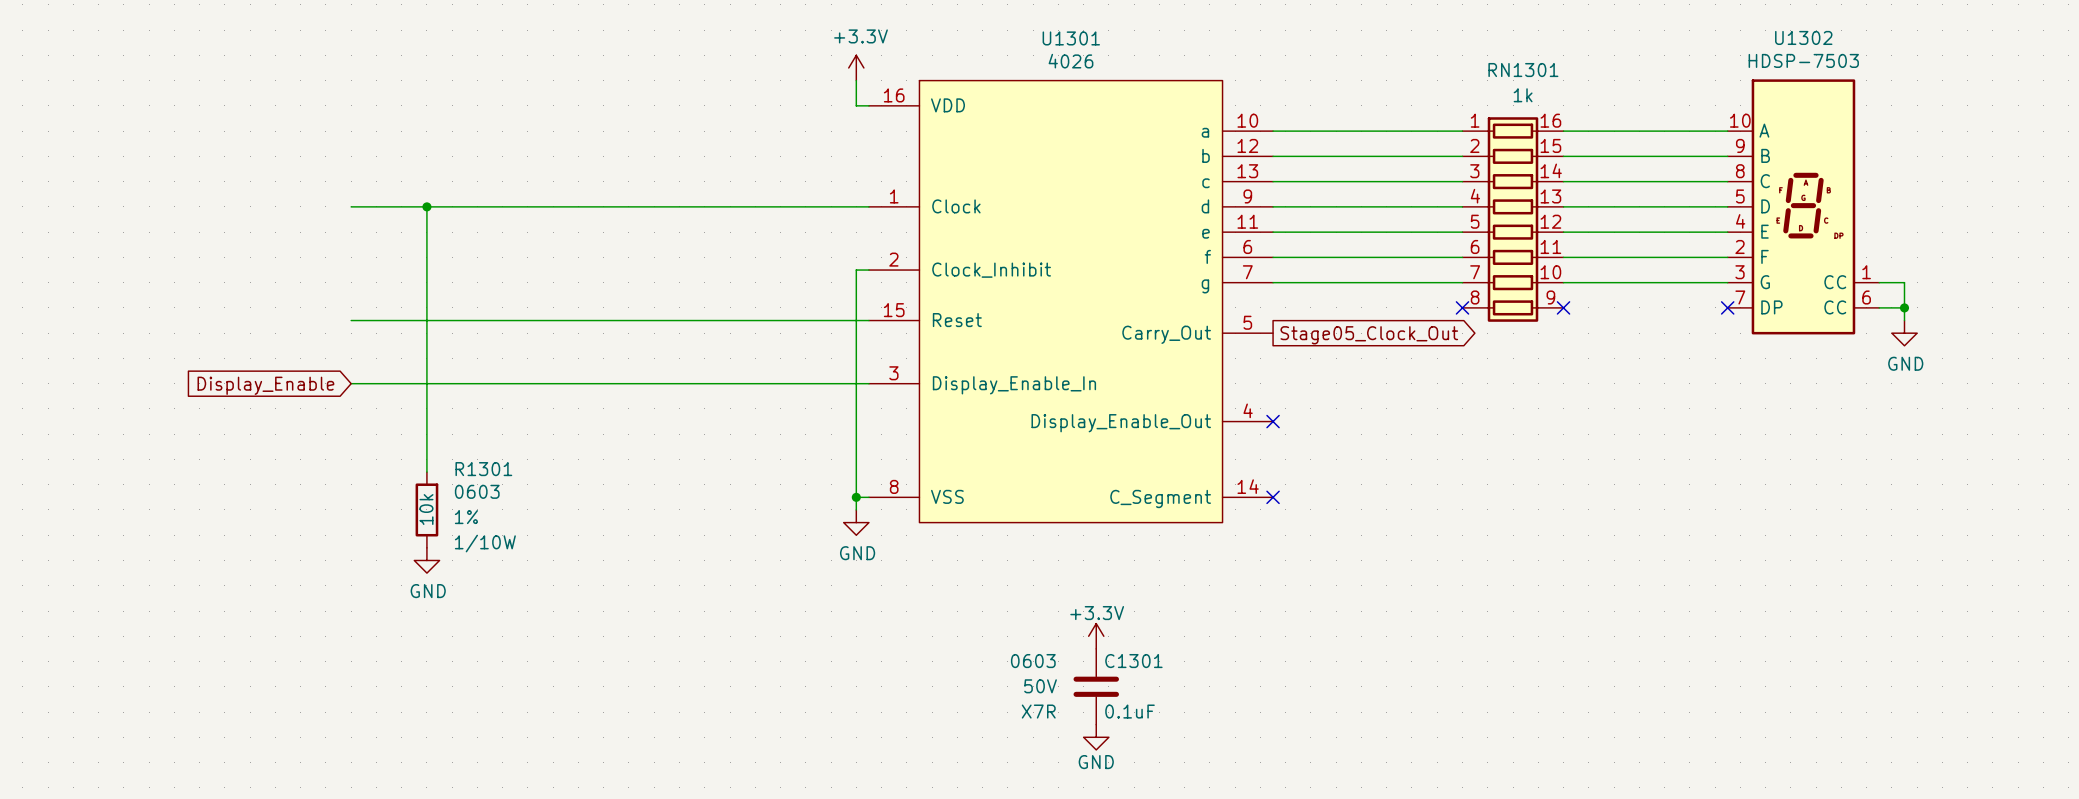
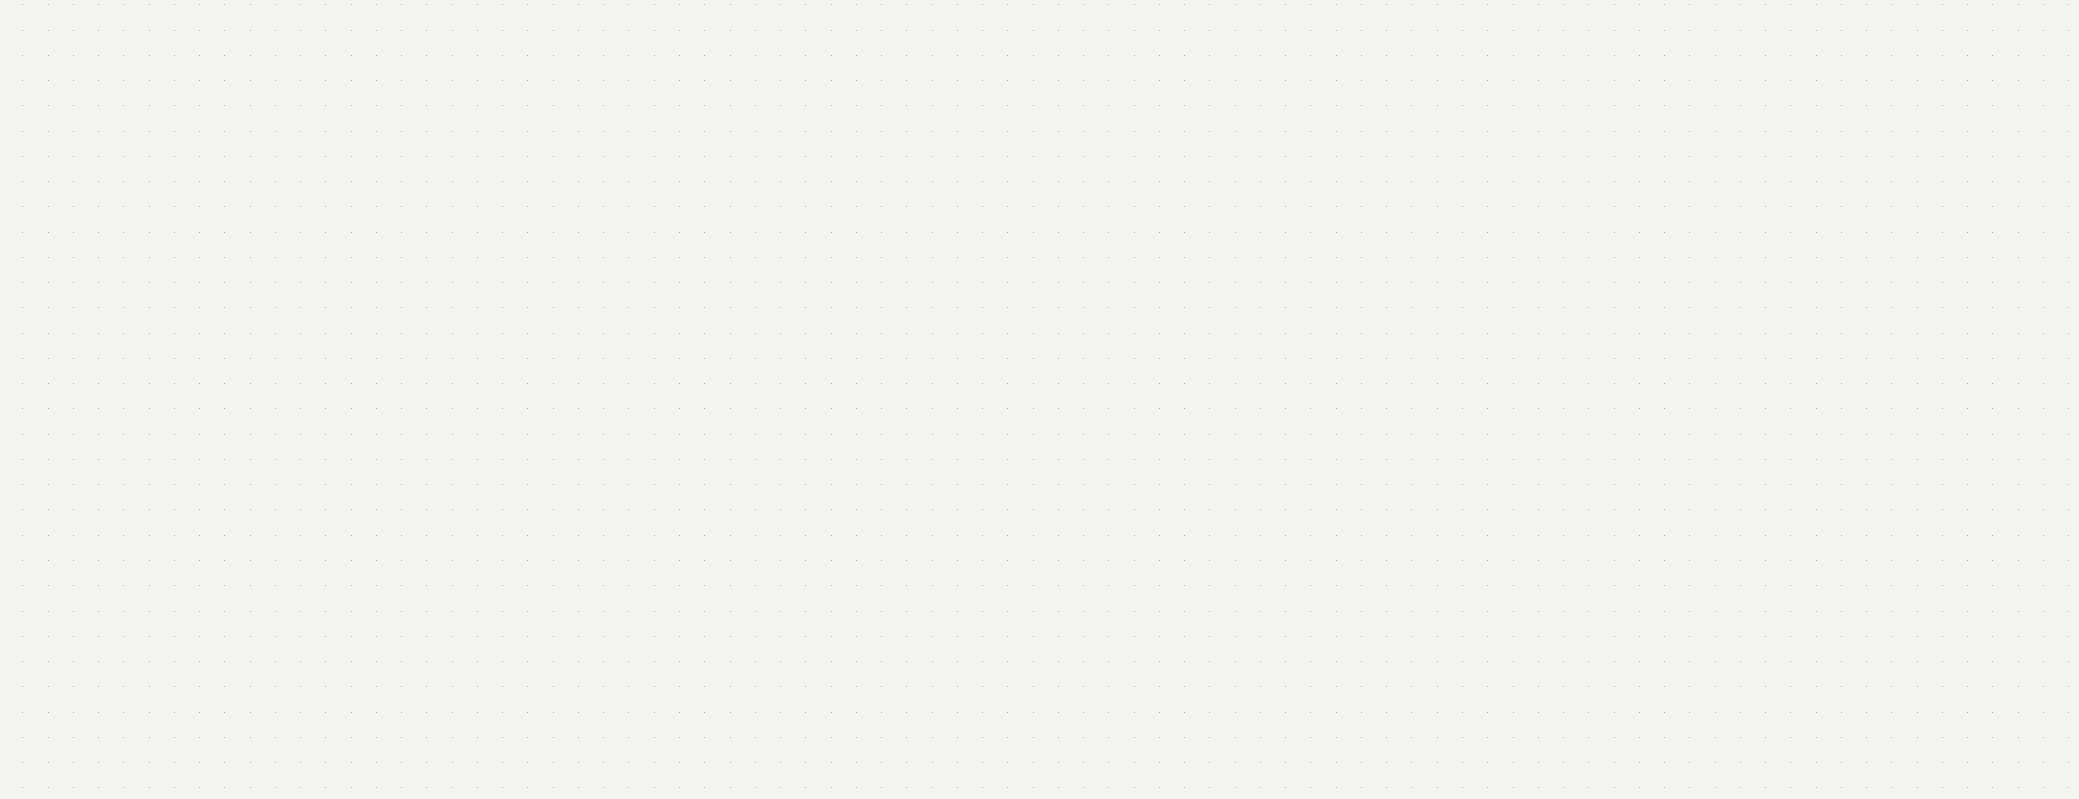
power symbol: +3.3V (856, 67) -> none
wire: (856, 80) (856, 105) (868, 105) -> none
wire: (1273, 131) (1462, 131) -> none
wire: (1563, 131) (1727, 131) -> none
wire: (1273, 156) (1462, 156) -> none
wire: (1563, 156) (1727, 156) -> none
wire: (1273, 181) (1462, 181) -> none
wire: (1563, 181) (1727, 181) -> none
wire: (351, 206) (868, 206) -> none
wire: (426, 206) (426, 472) -> none
junction: (426, 206) -> none
wire: (1273, 206) (1462, 206) -> none
wire: (1563, 206) (1727, 206) -> none
U1302: HDSP-7503 (1803, 206) -> none
RN1301: 1k (1513, 219) -> none
wire: (1273, 232) (1462, 232) -> none
wire: (1563, 232) (1727, 232) -> none
wire: (1273, 257) (1462, 257) -> none
wire: (1563, 257) (1727, 257) -> none
wire: (868, 270) (856, 270) (856, 509) -> none
wire: (1273, 282) (1462, 282) -> none
wire: (1563, 282) (1727, 282) -> none
wire: (1879, 282) (1904, 282) (1904, 320) -> none
U1301: 4026 (1071, 301) -> none
no-connect mark: (1462, 307) -> none
no-connect mark: (1563, 307) -> none
no-connect mark: (1727, 307) -> none
wire: (1879, 307) (1904, 307) -> none
junction: (1904, 307) -> none
wire: (351, 320) (868, 320) -> none
power symbol: GND (1904, 333) -> none
global label: Stage05_Clock_Out (1369, 335) -> none
wire: (351, 383) (868, 383) -> none
global label: Display_Enable (265, 385) -> none
no-connect mark: (1273, 421) -> none
wire: (856, 497) (868, 497) -> none
junction: (856, 497) -> none
no-connect mark: (1273, 497) -> none
R1301: 10k (426, 509) -> none
power symbol: GND (856, 522) -> none
power symbol: GND (426, 560) -> none
power symbol: +3.3V (1096, 636) -> none
C1301: 0.1uF (1096, 686) -> none
power symbol: GND (1096, 737) -> none

